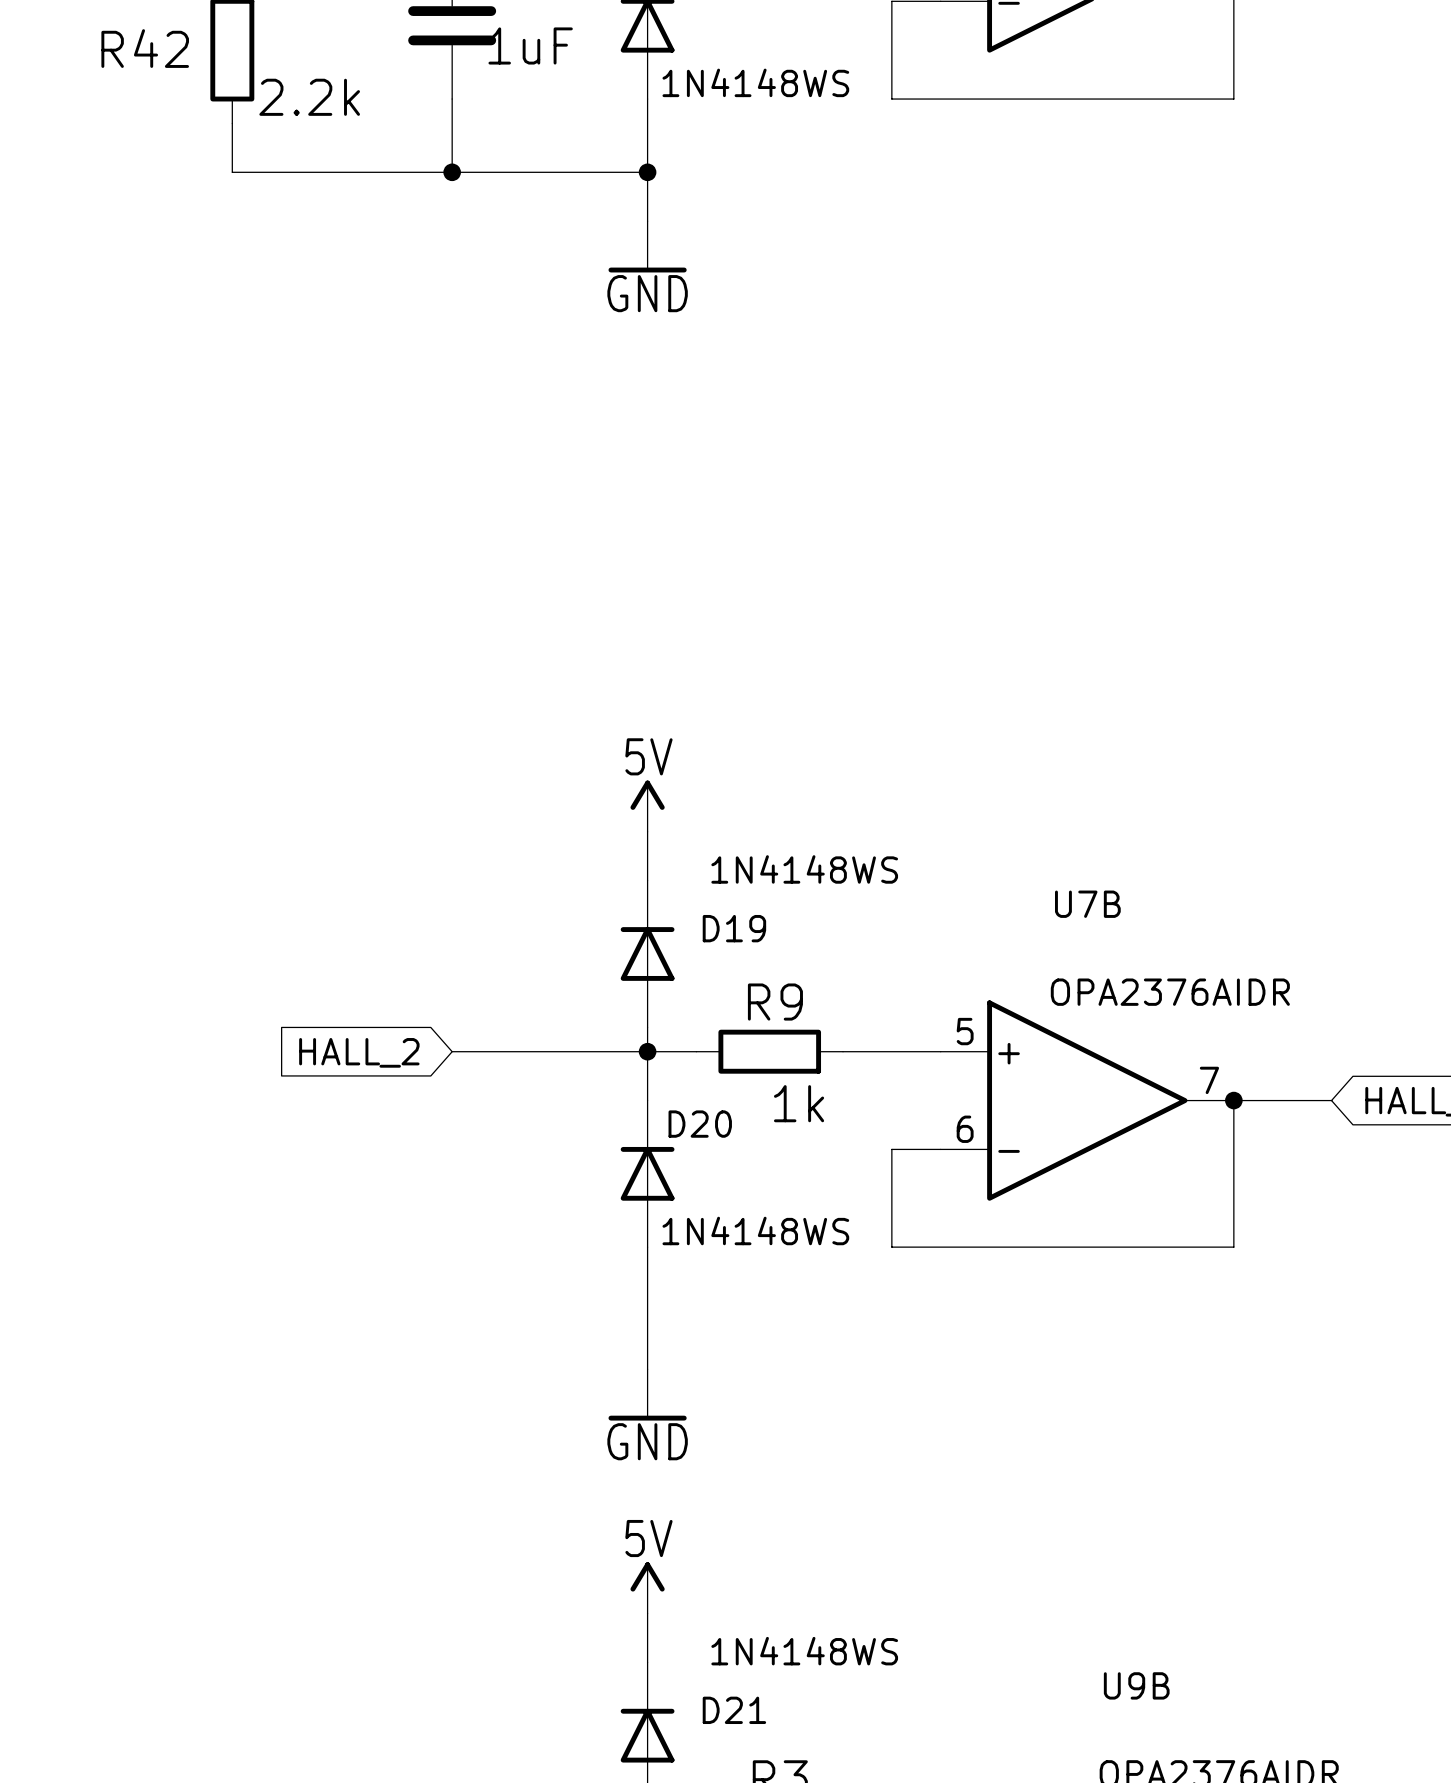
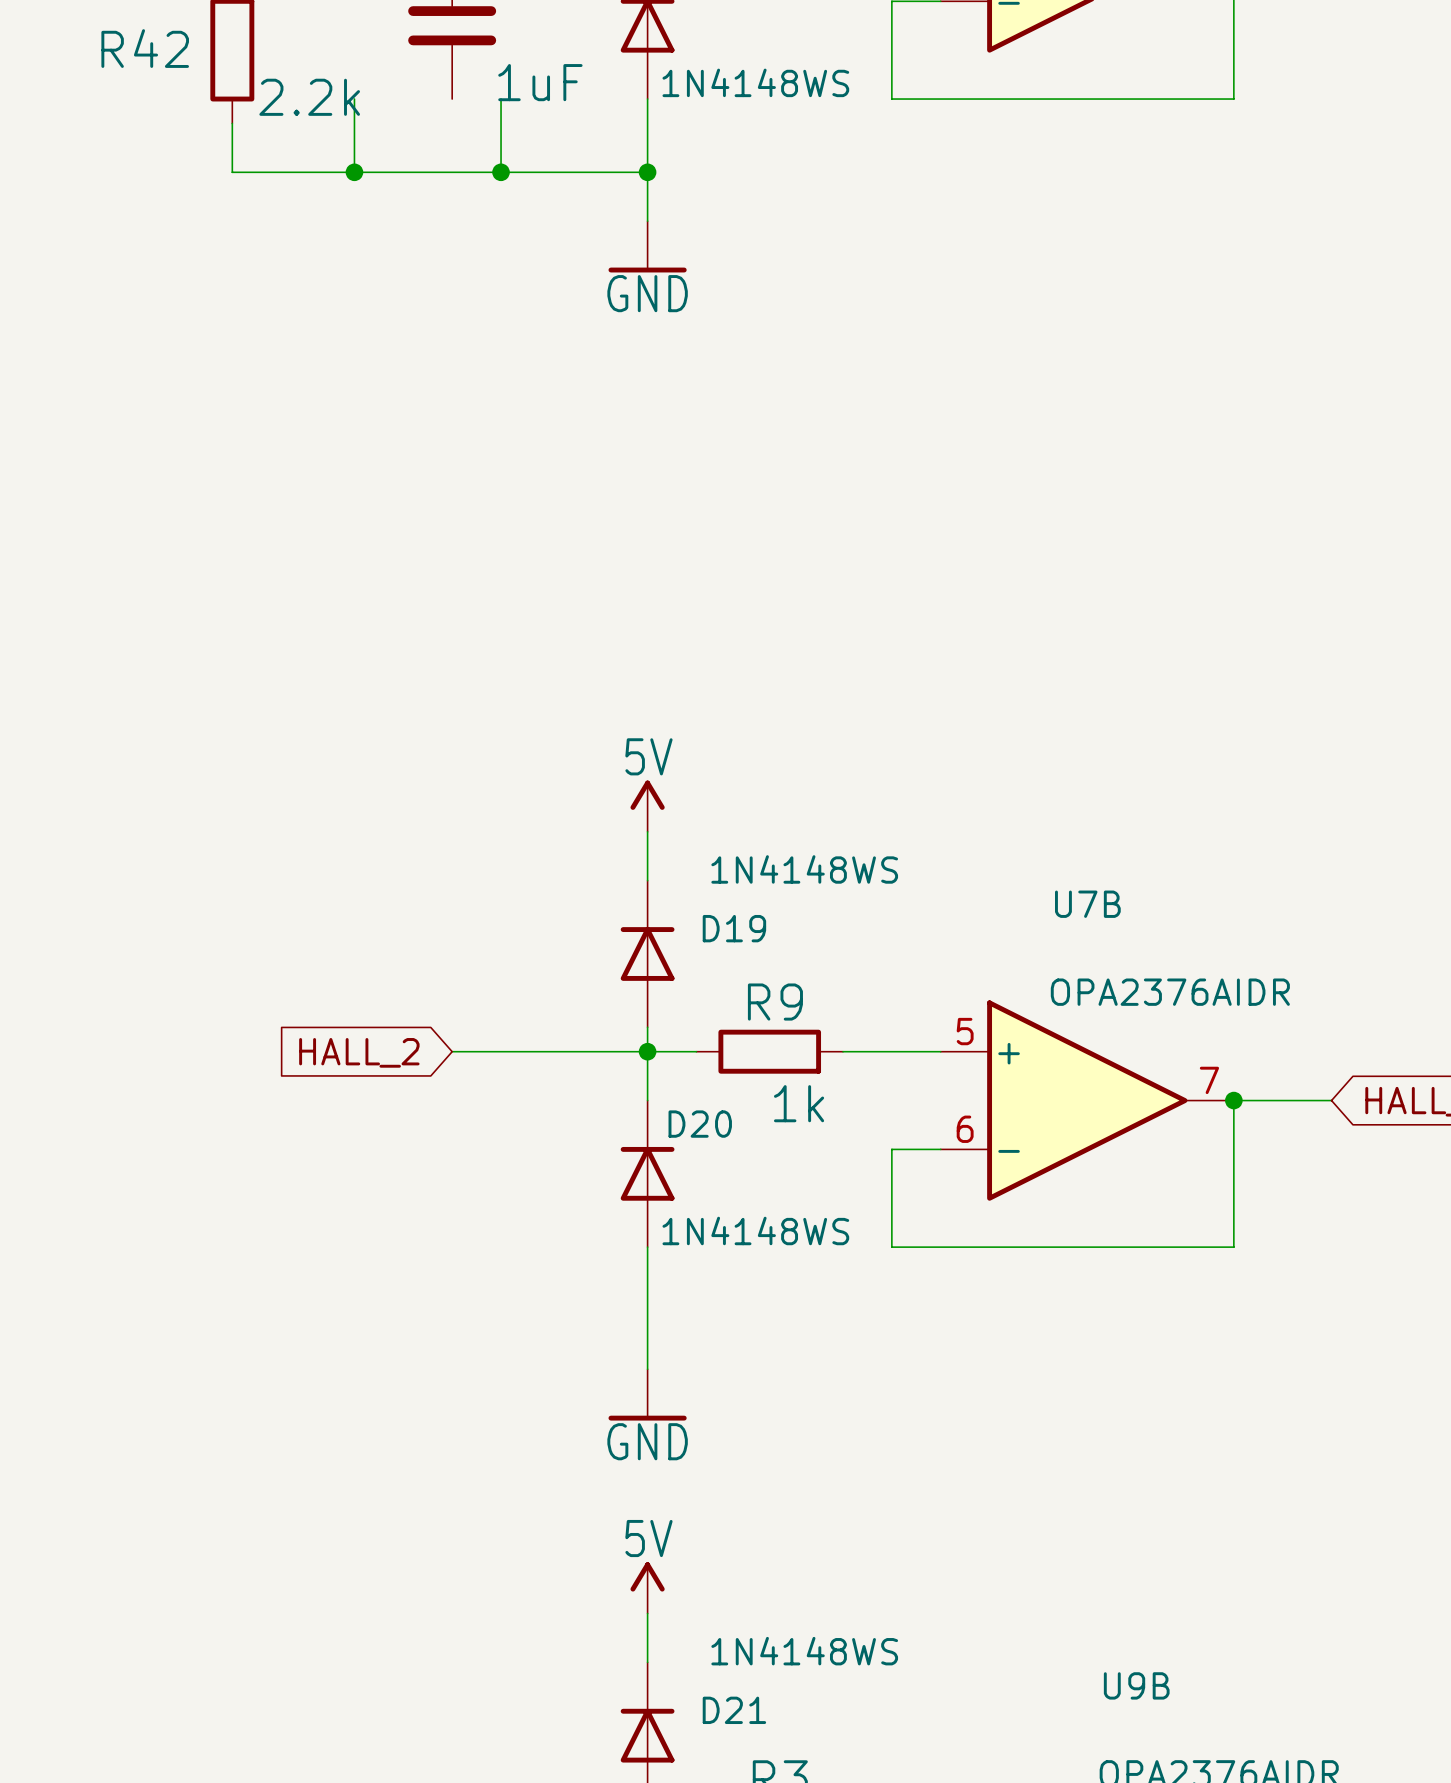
part value position: 1uF (530, 45) -> 1uF (540, 82)
wire: none -> (354, 99) (354, 172)
wire: (452, 99) (452, 172) -> (501, 99) (501, 172)
junction: none -> (354, 172)
junction: (452, 172) -> none
junction: none -> (501, 172)

